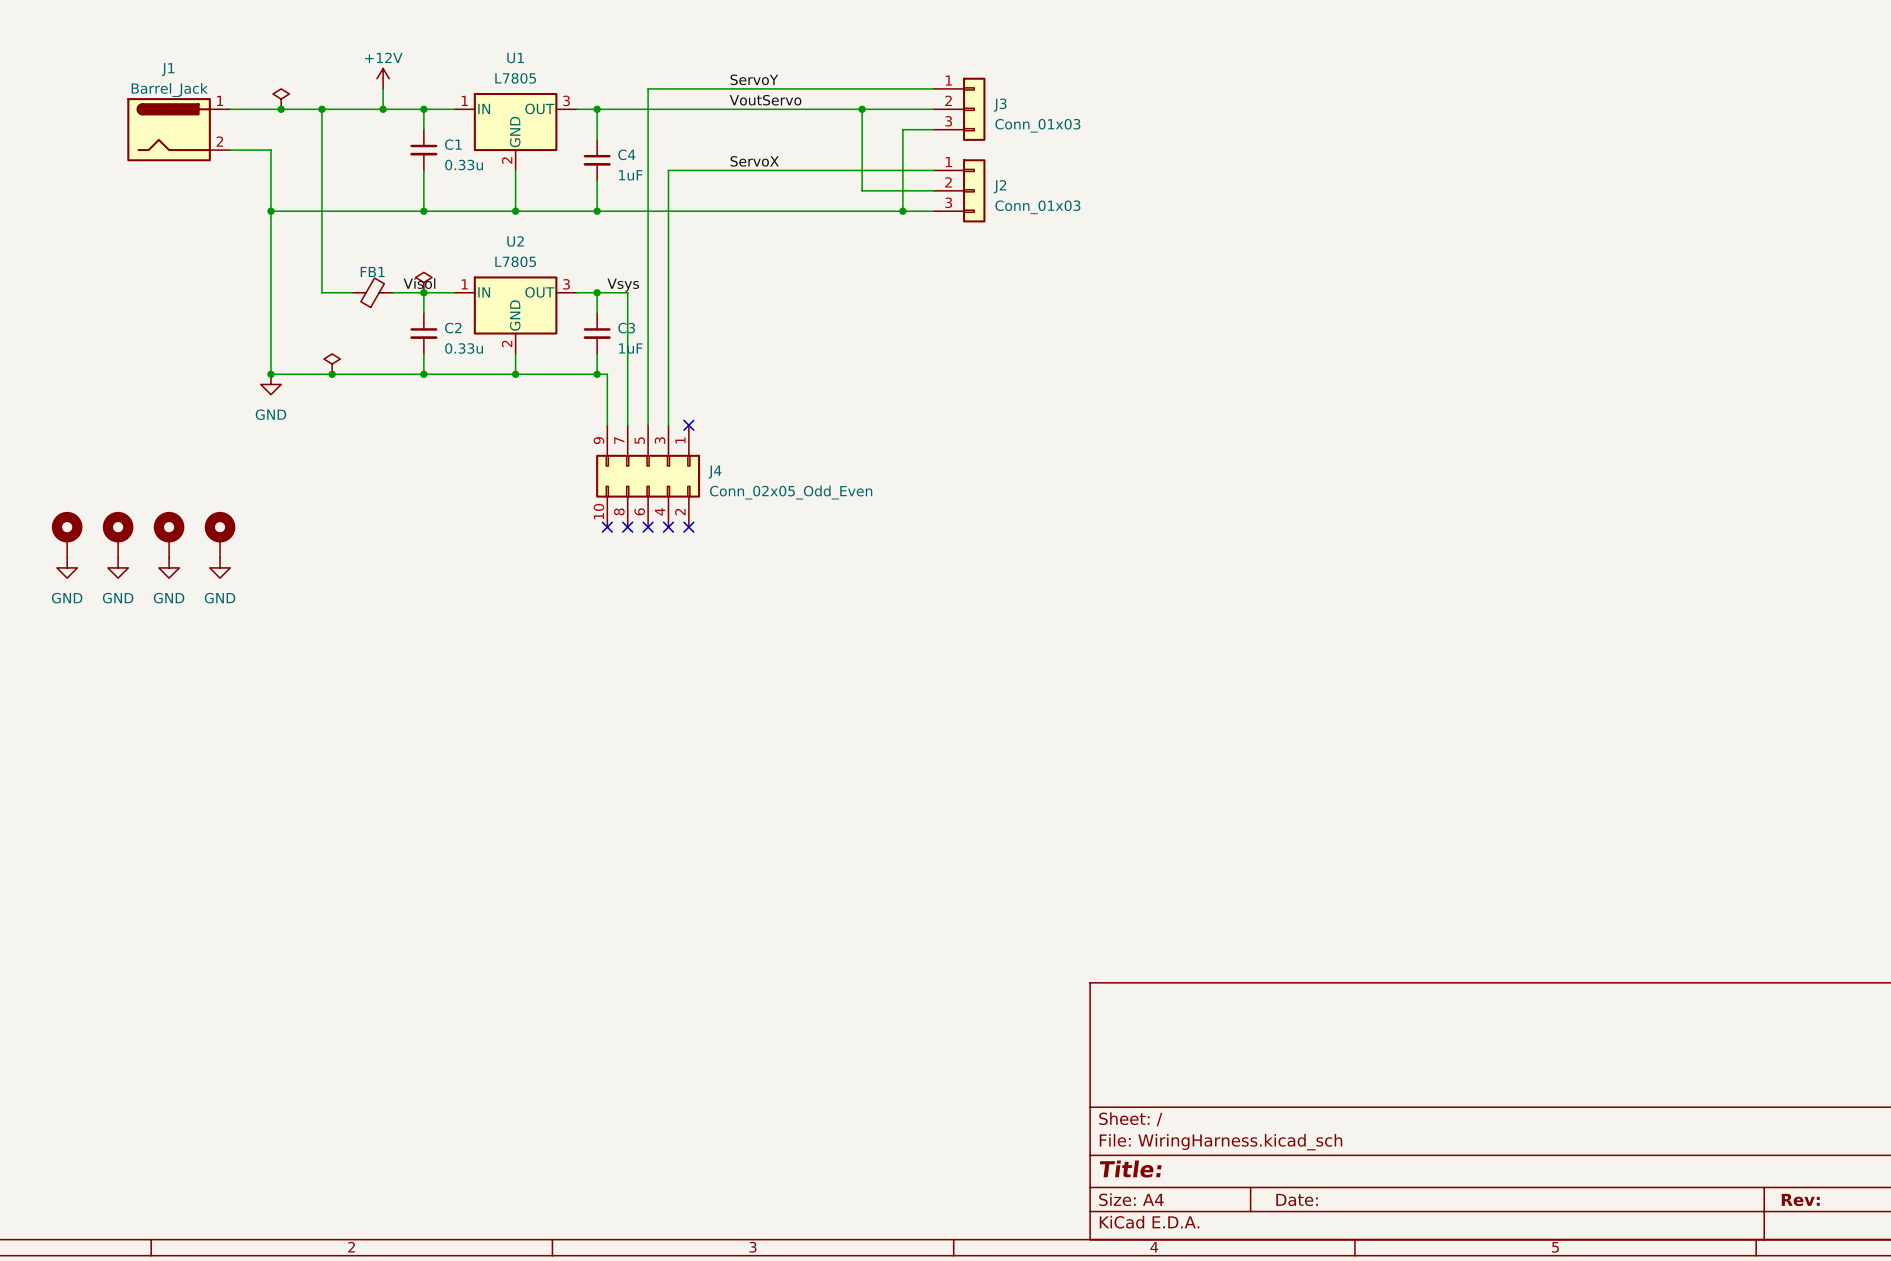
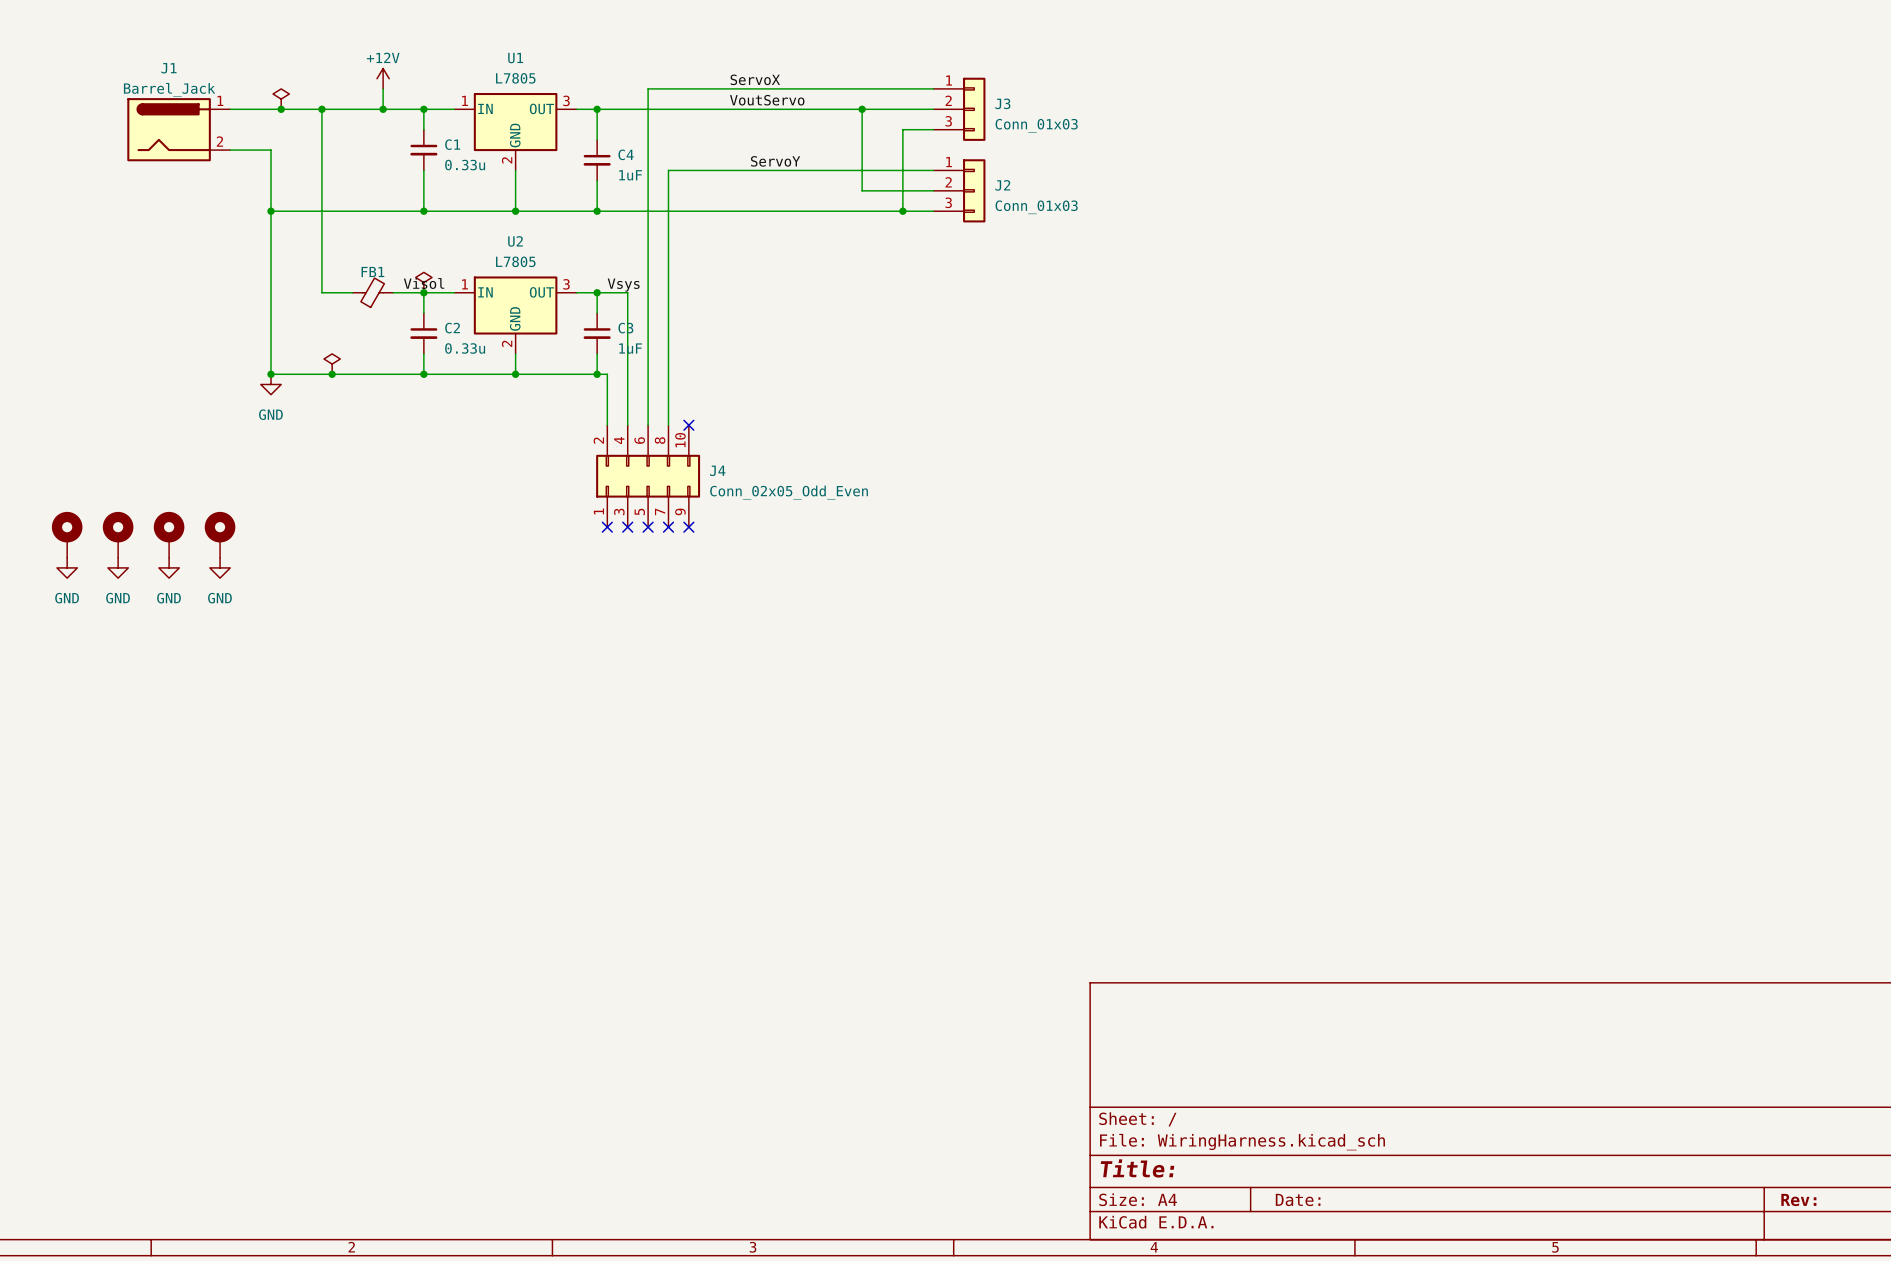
label: ServoY (754, 79) -> ServoX (755, 79)
label: ServoX (754, 161) -> ServoY (775, 161)
J4 rotation: 0° (648, 476) -> 180° (648, 476)

